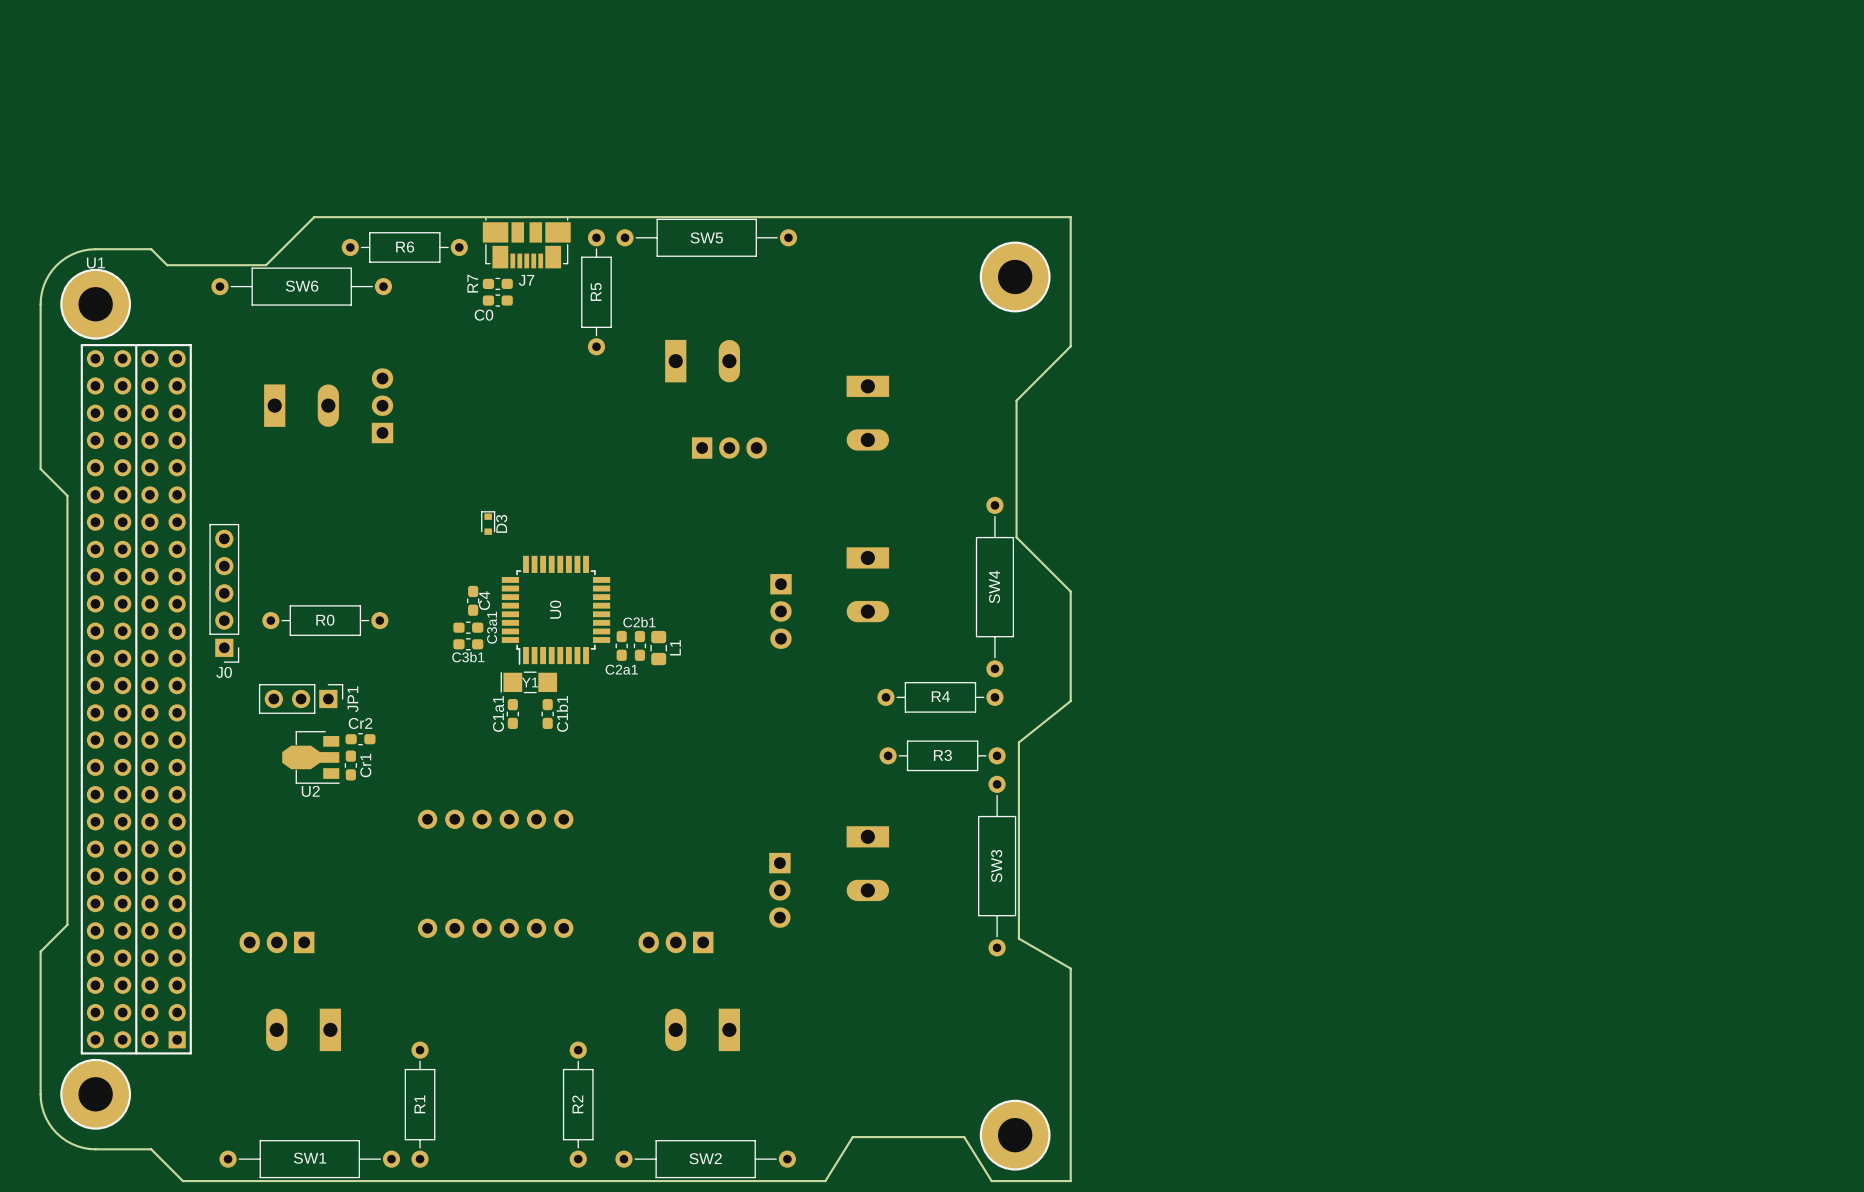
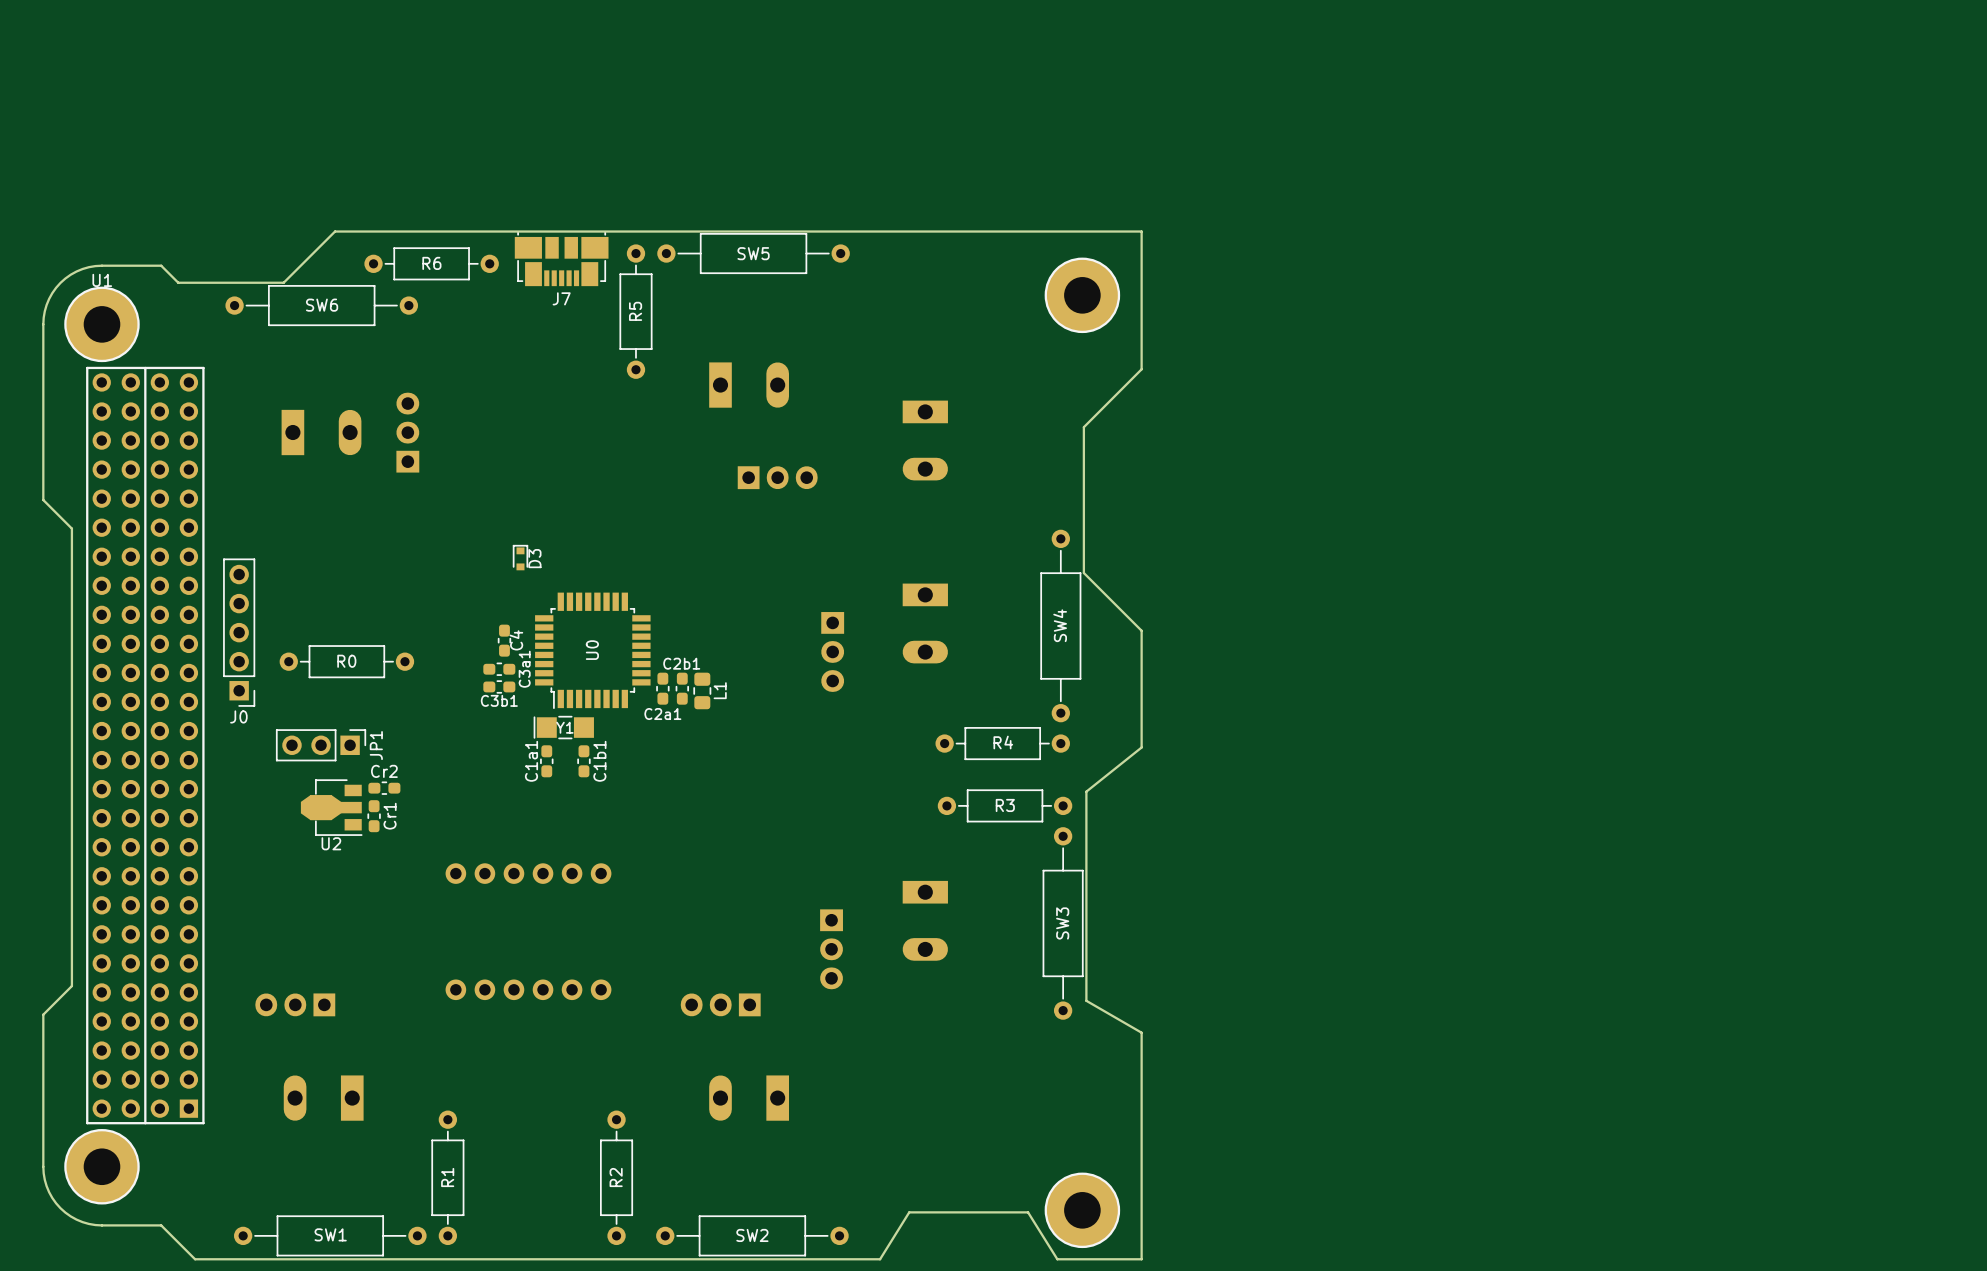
R7: (497, 283) -> none
C0: (497, 300) -> none

